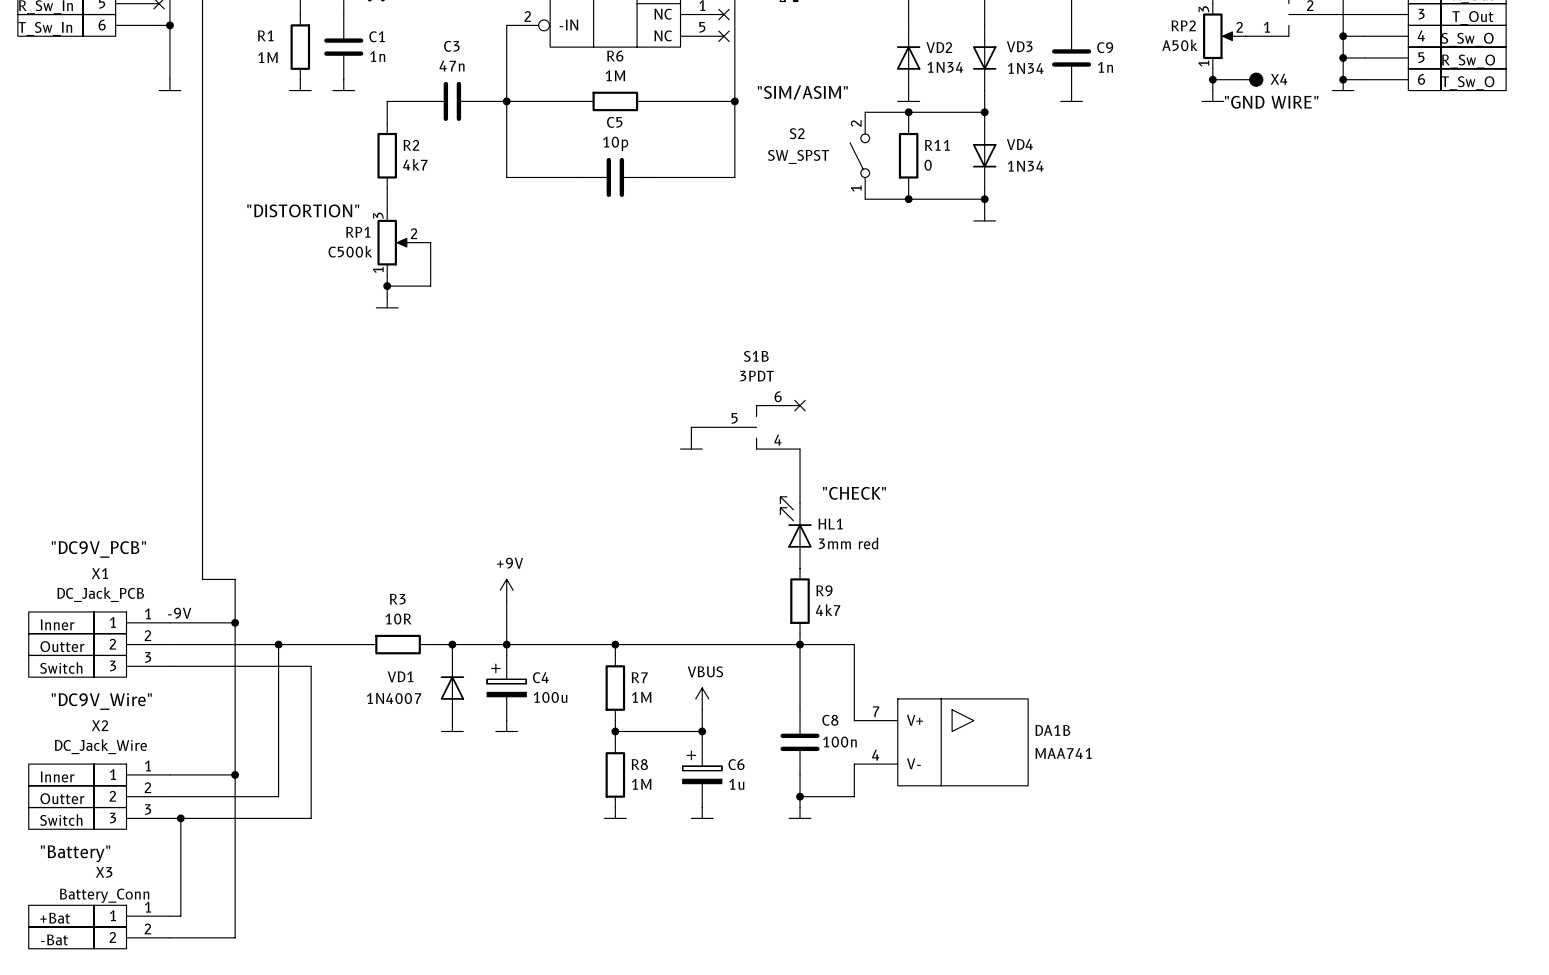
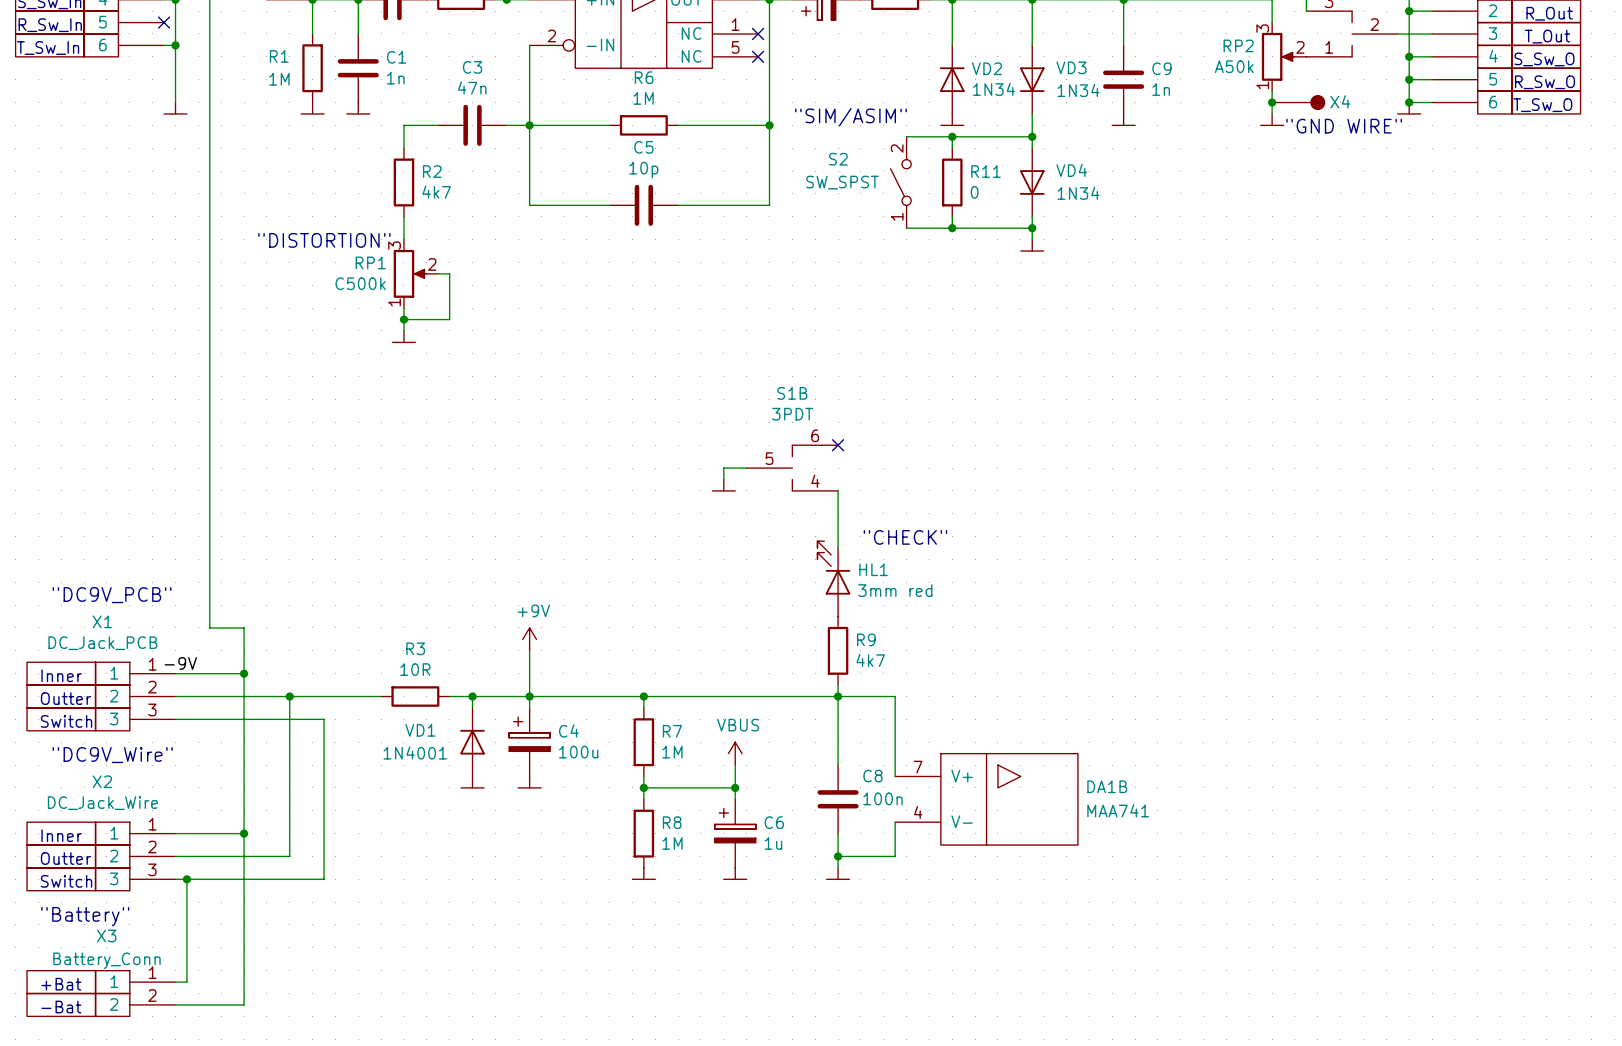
VD1 value: 1N4007 (394, 698) -> 1N4001 (415, 752)

